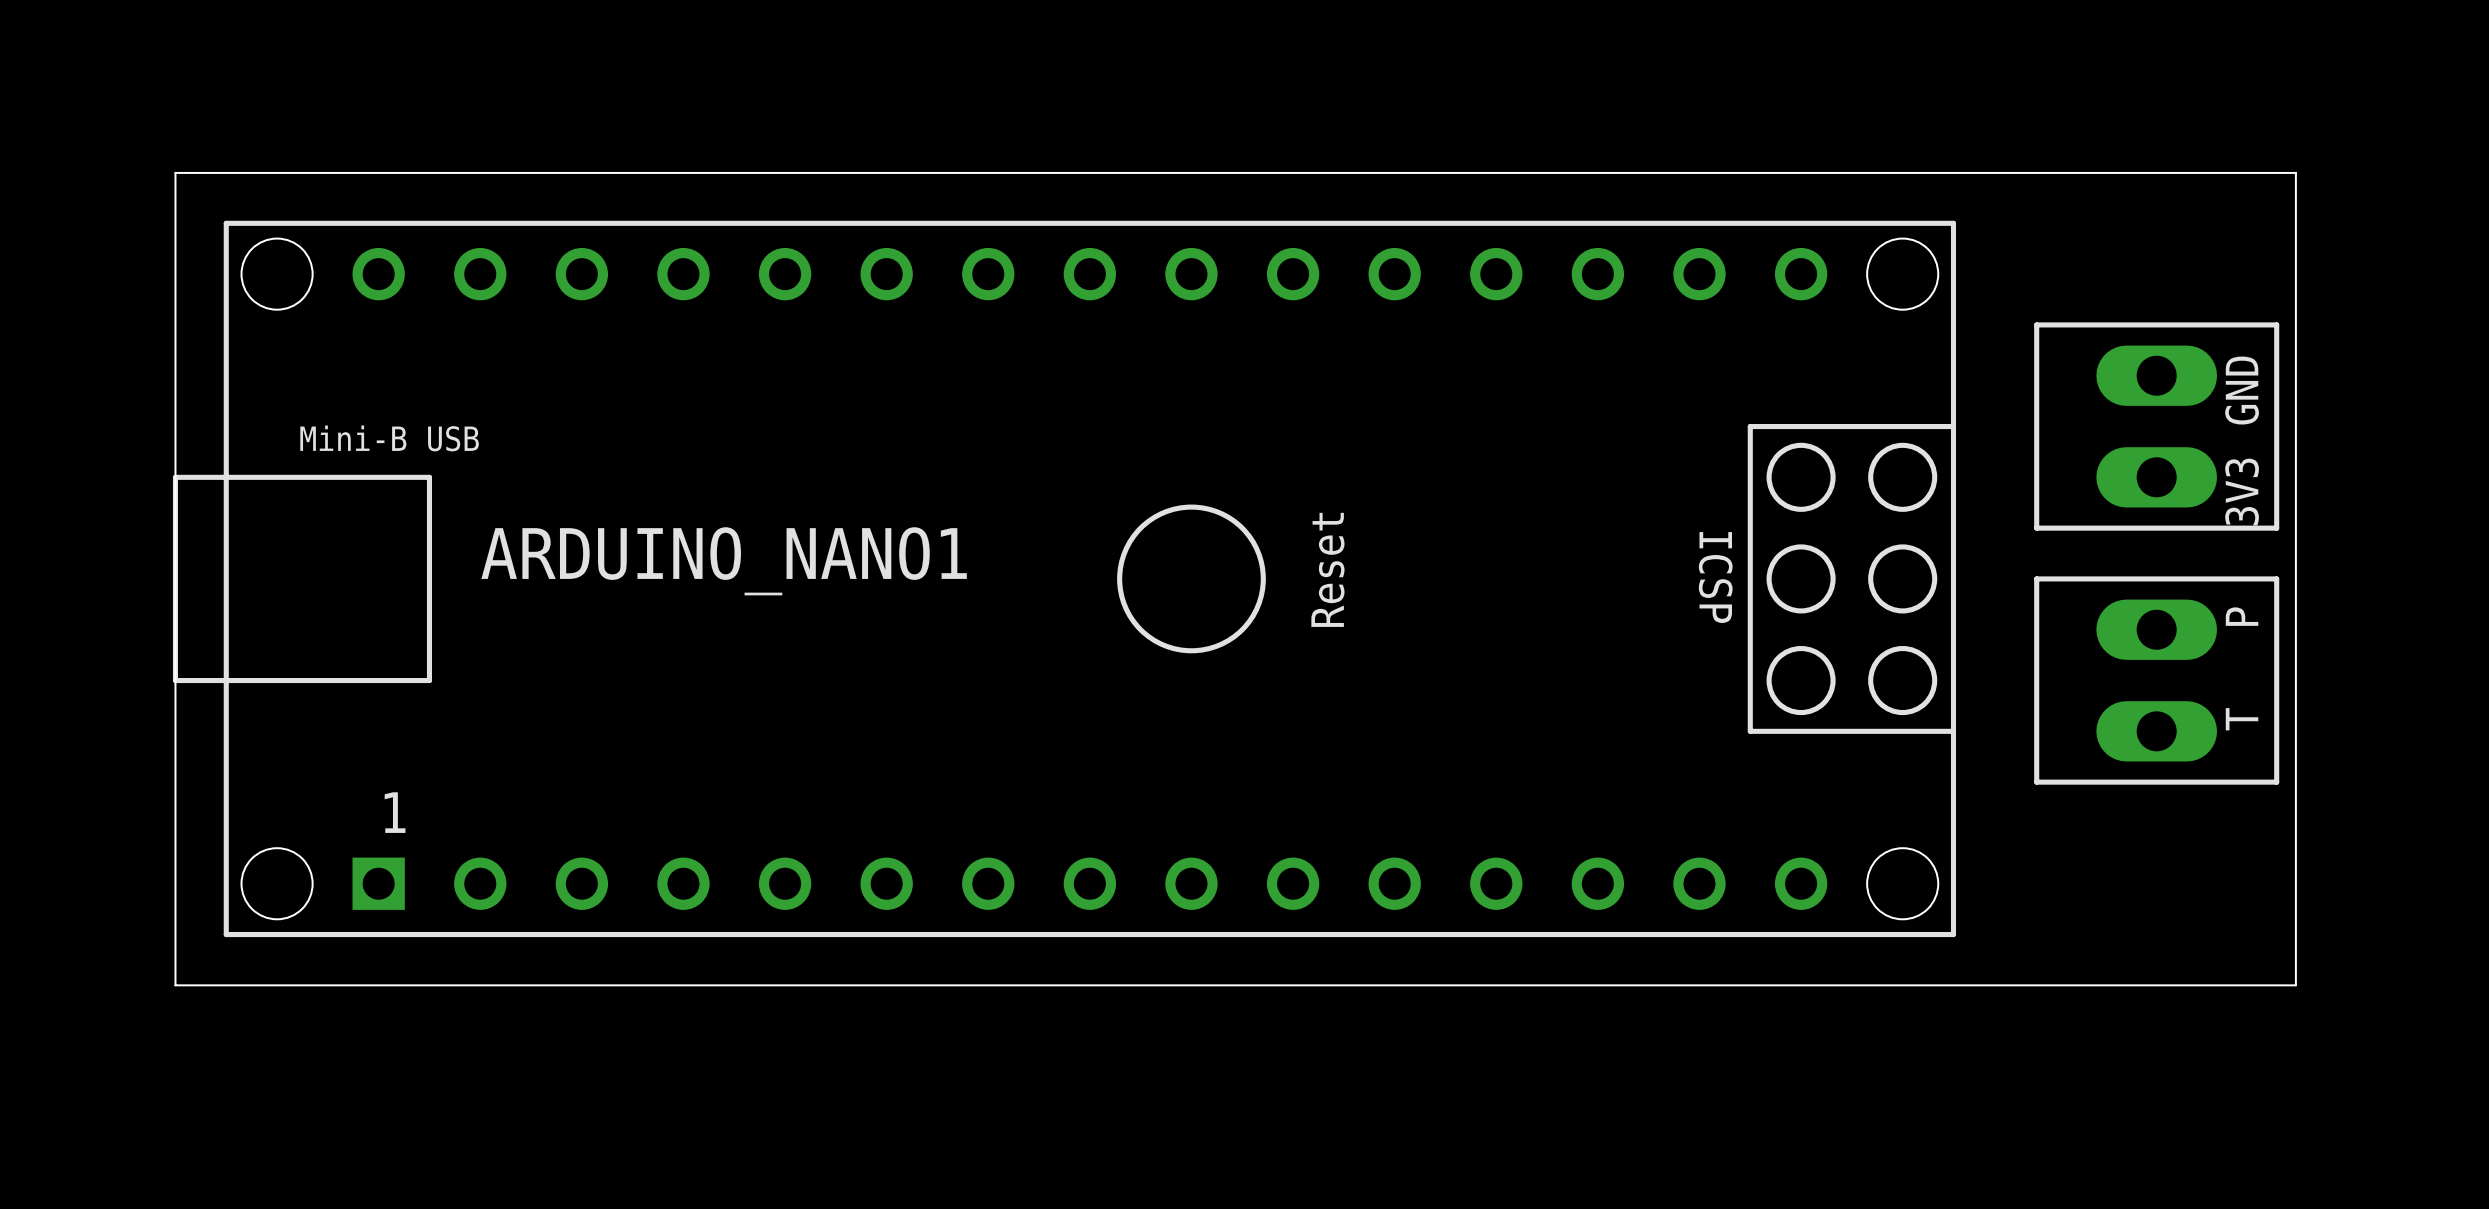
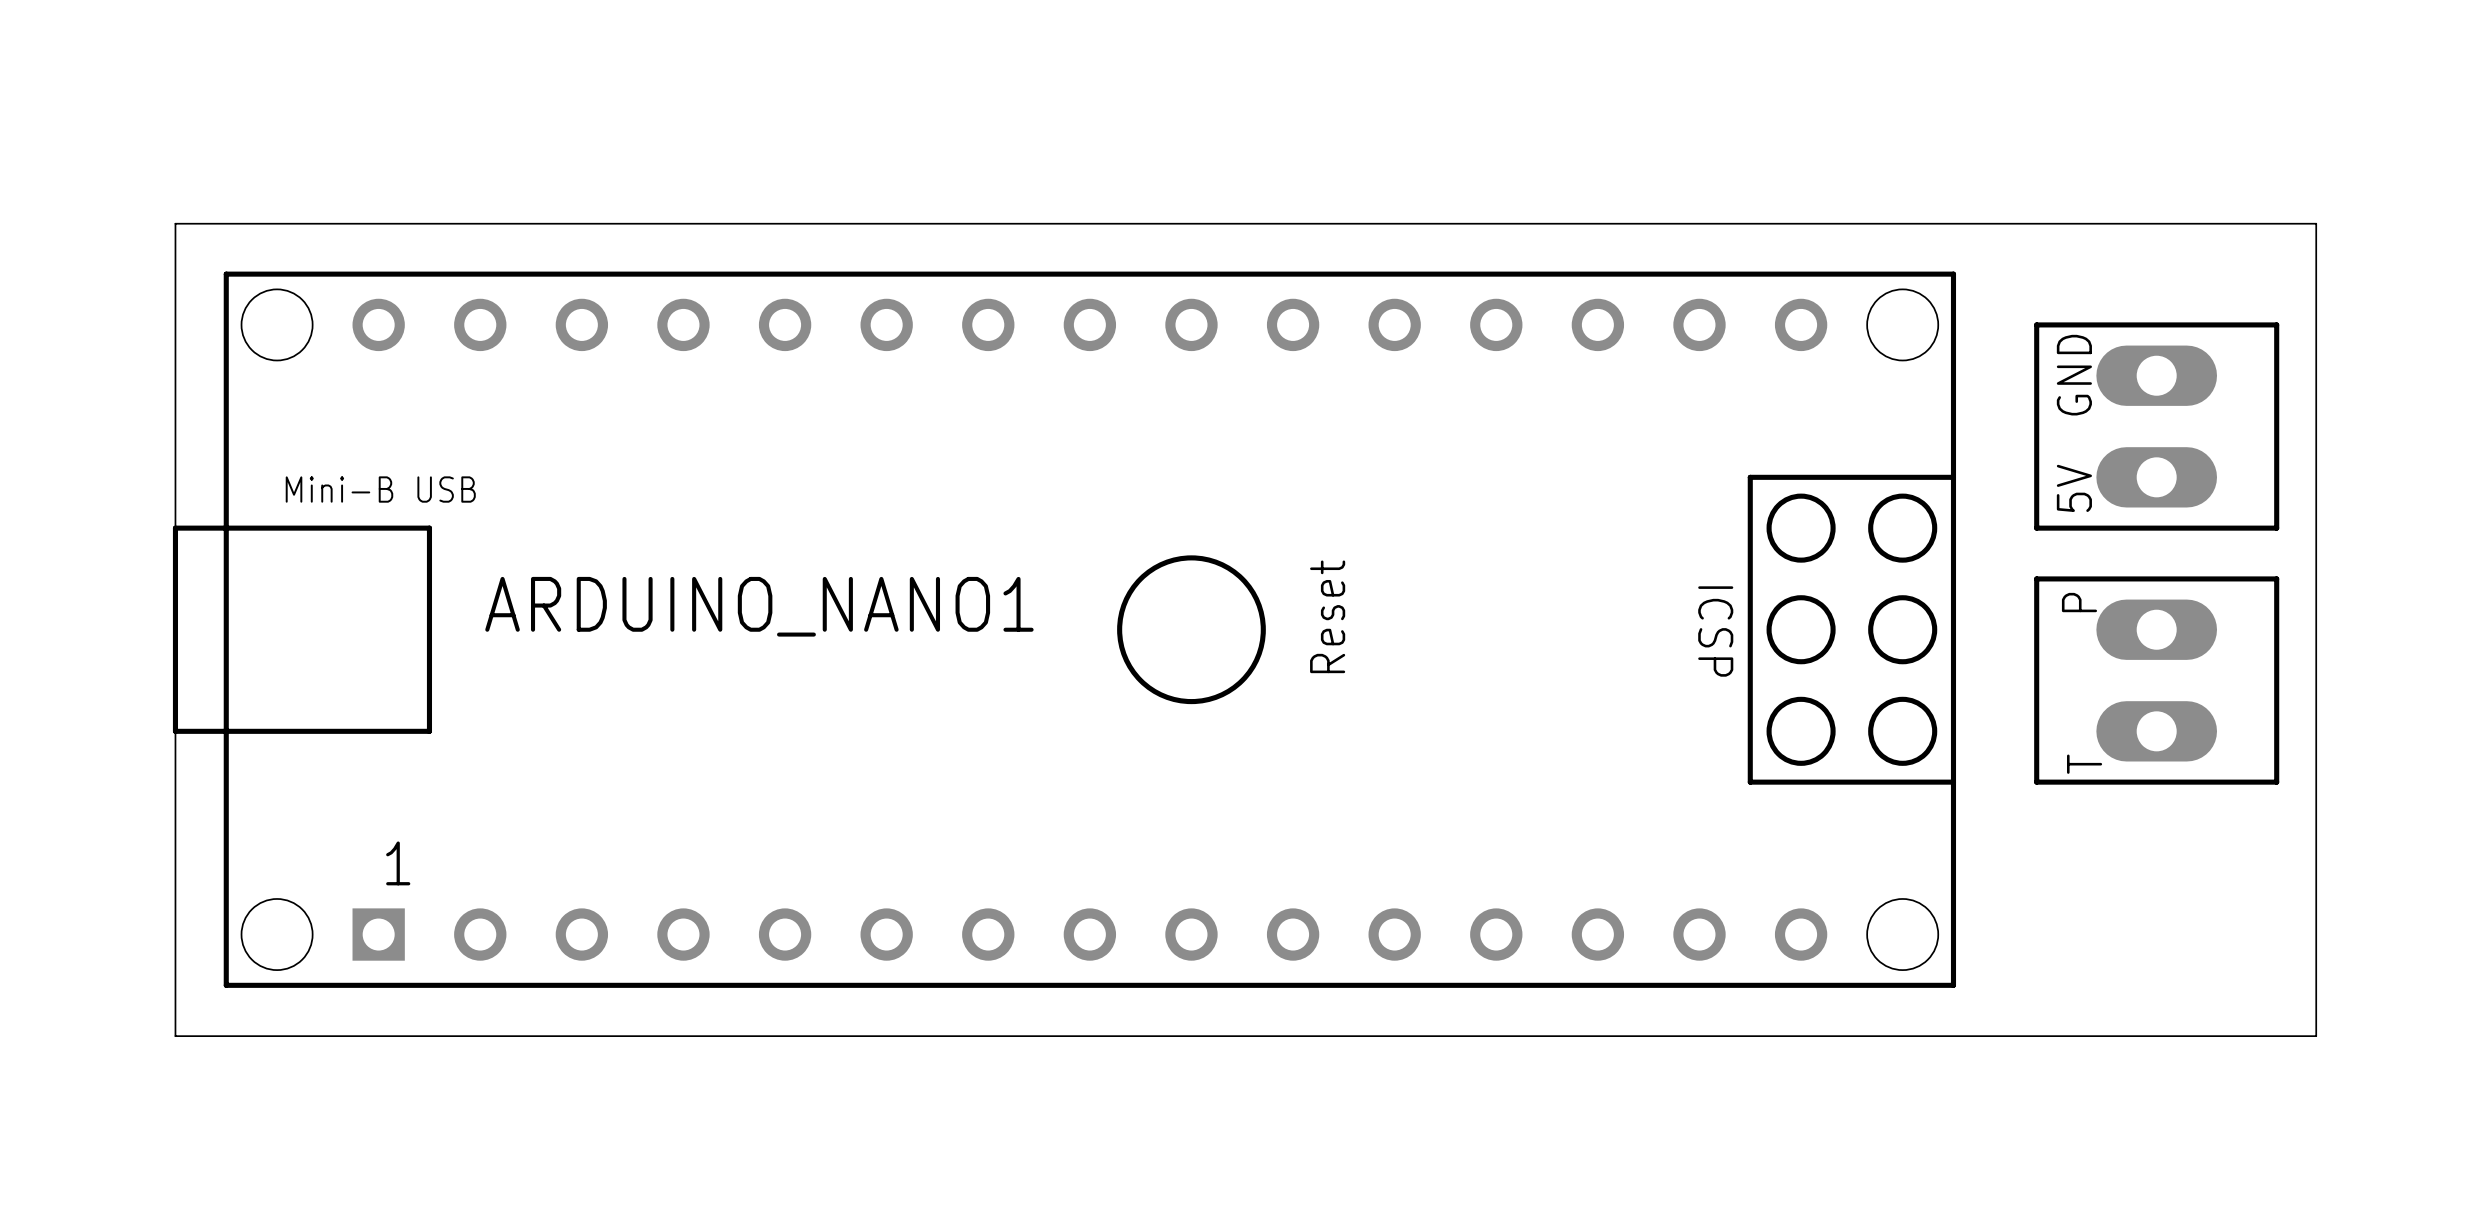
board edge: (175, 223) (175, 172) (2295, 172) (2295, 985) (175, 985) -> (175, 223) (2316, 223) (2316, 1036) (175, 1036) (175, 985)
text position: GND (2242, 390) -> GND (2074, 375)
text: none -> 5V (2074, 488)
text: 3V3 (2242, 492) -> none
ARDUINO_NANO1 position: (1064, 578) -> (1064, 629)
text position: P (2242, 616) -> P (2079, 602)
text position: T (2242, 719) -> T (2084, 764)

